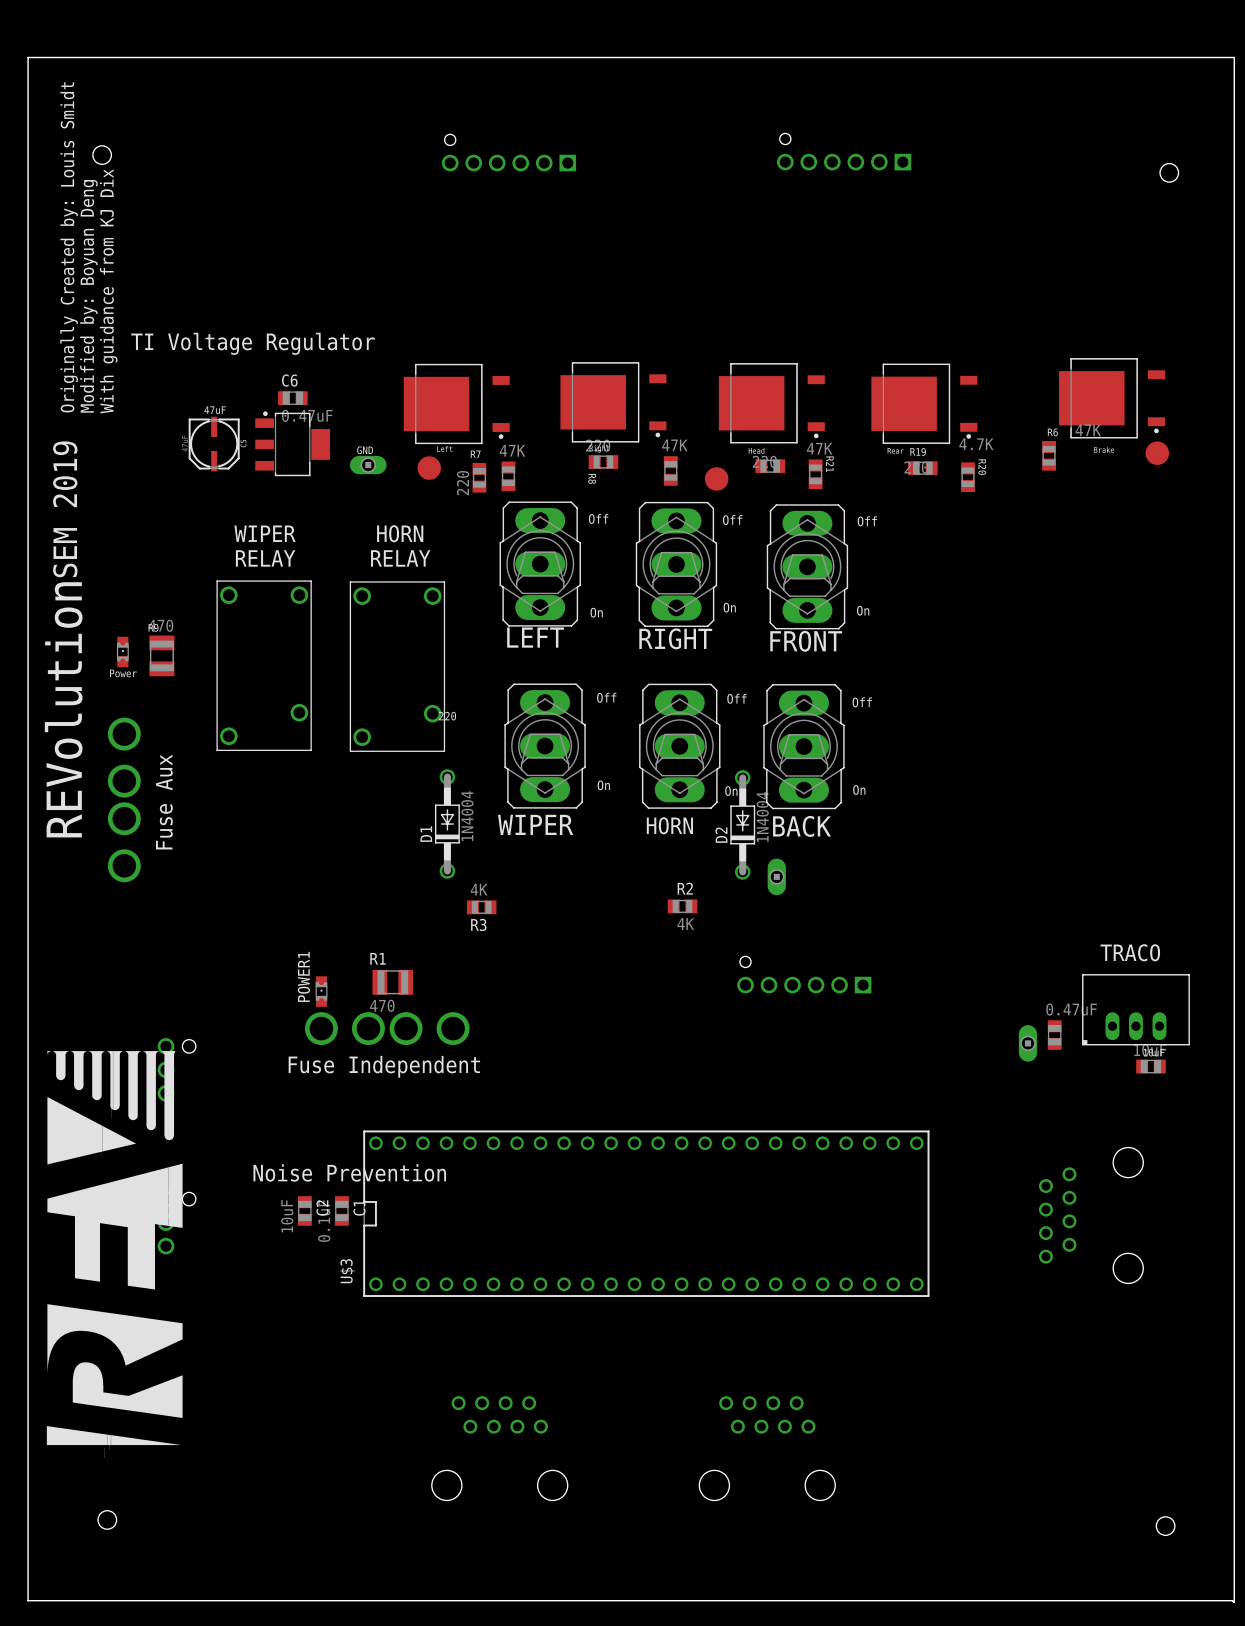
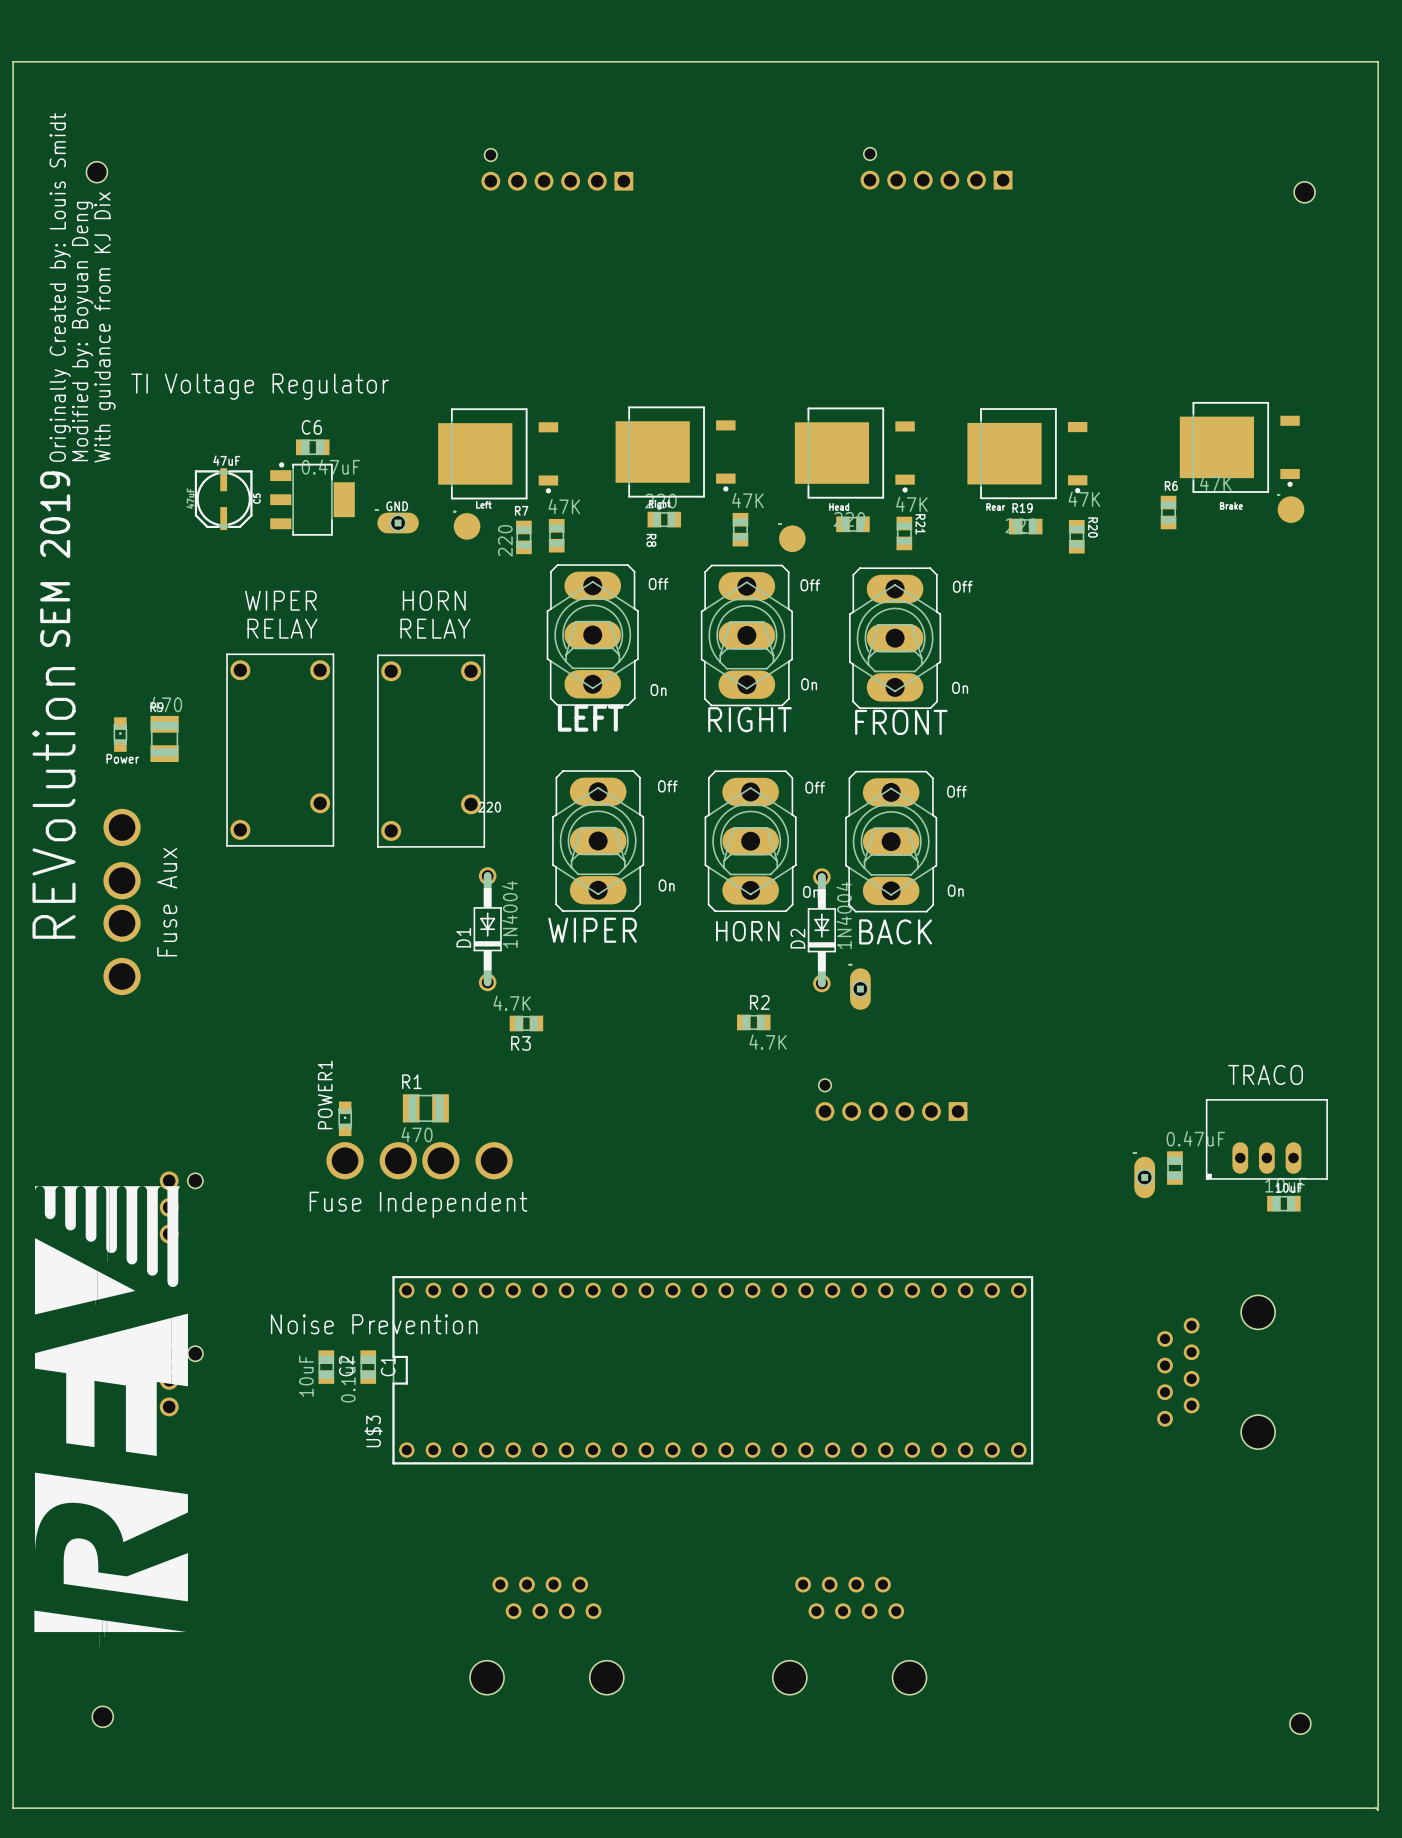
R20 value: 4.7K (976, 444) -> 47K (1084, 499)
R3 value: 4K (479, 889) -> 4.7K (512, 1003)
R2 value: 4K (685, 924) -> 4.7K (768, 1042)

